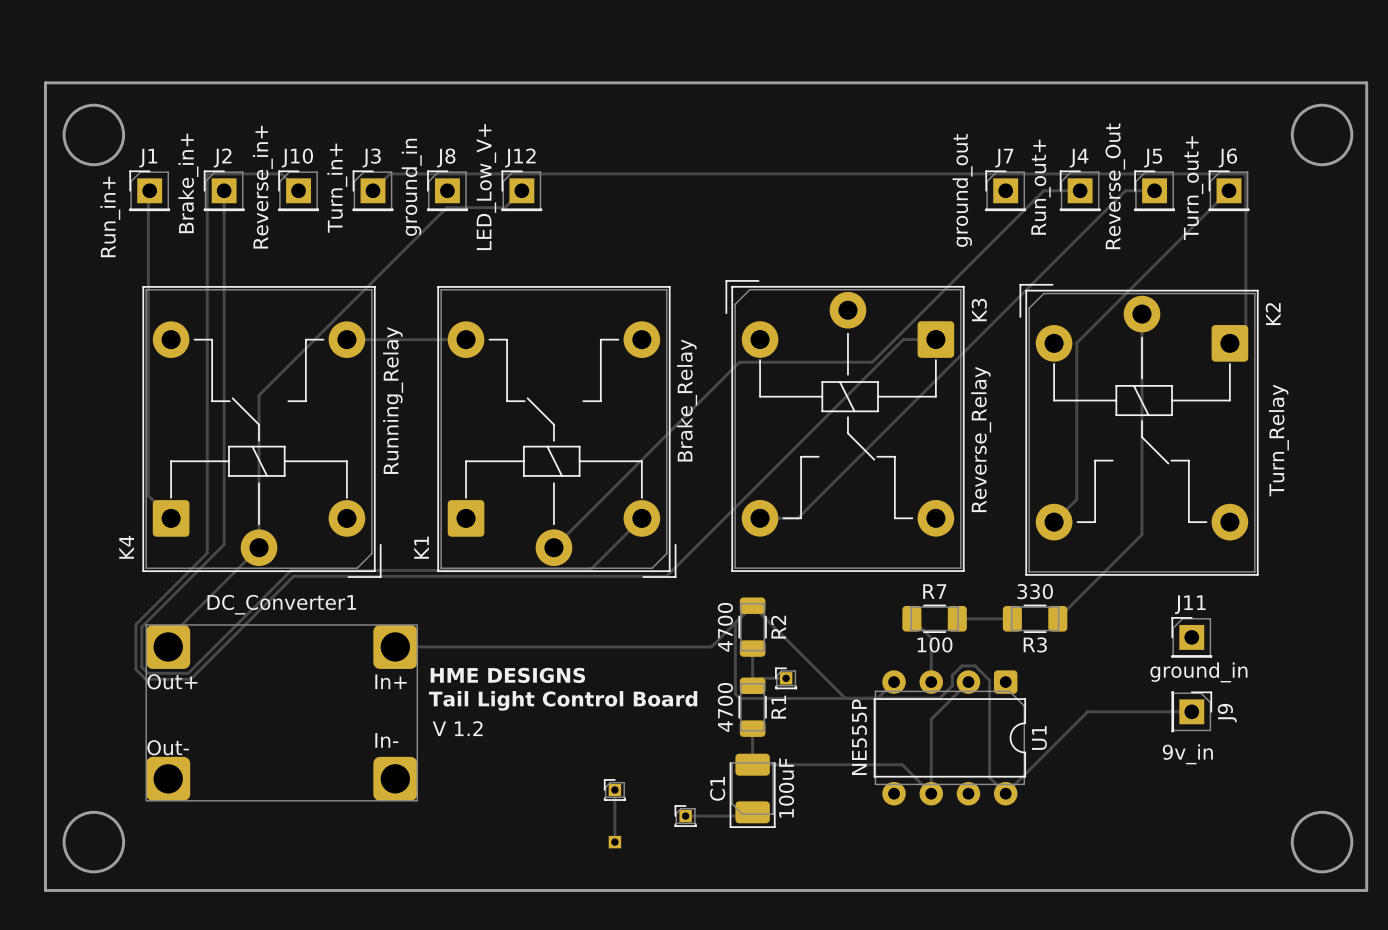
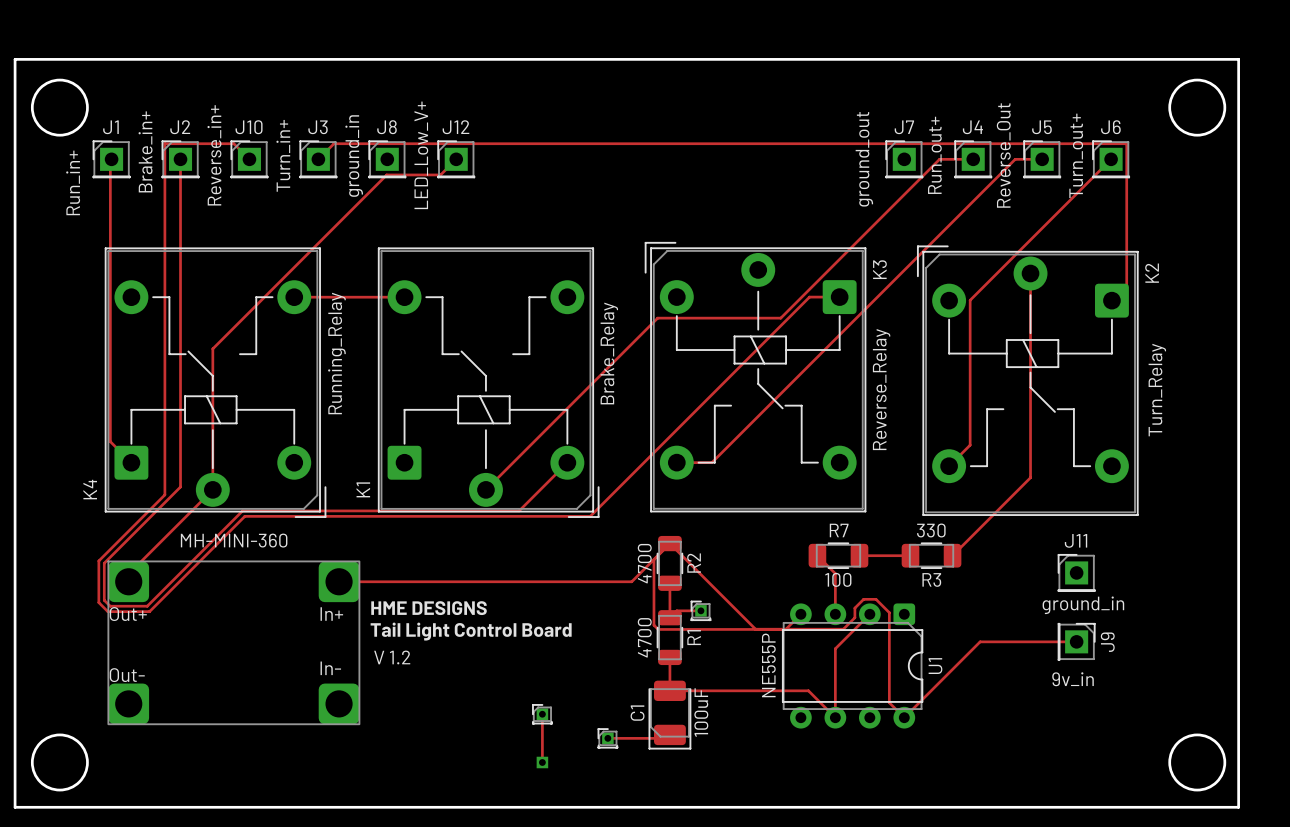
DC_Converter1 name: DC_Converter1 (281, 604) -> MH-MINI-360 (234, 540)

